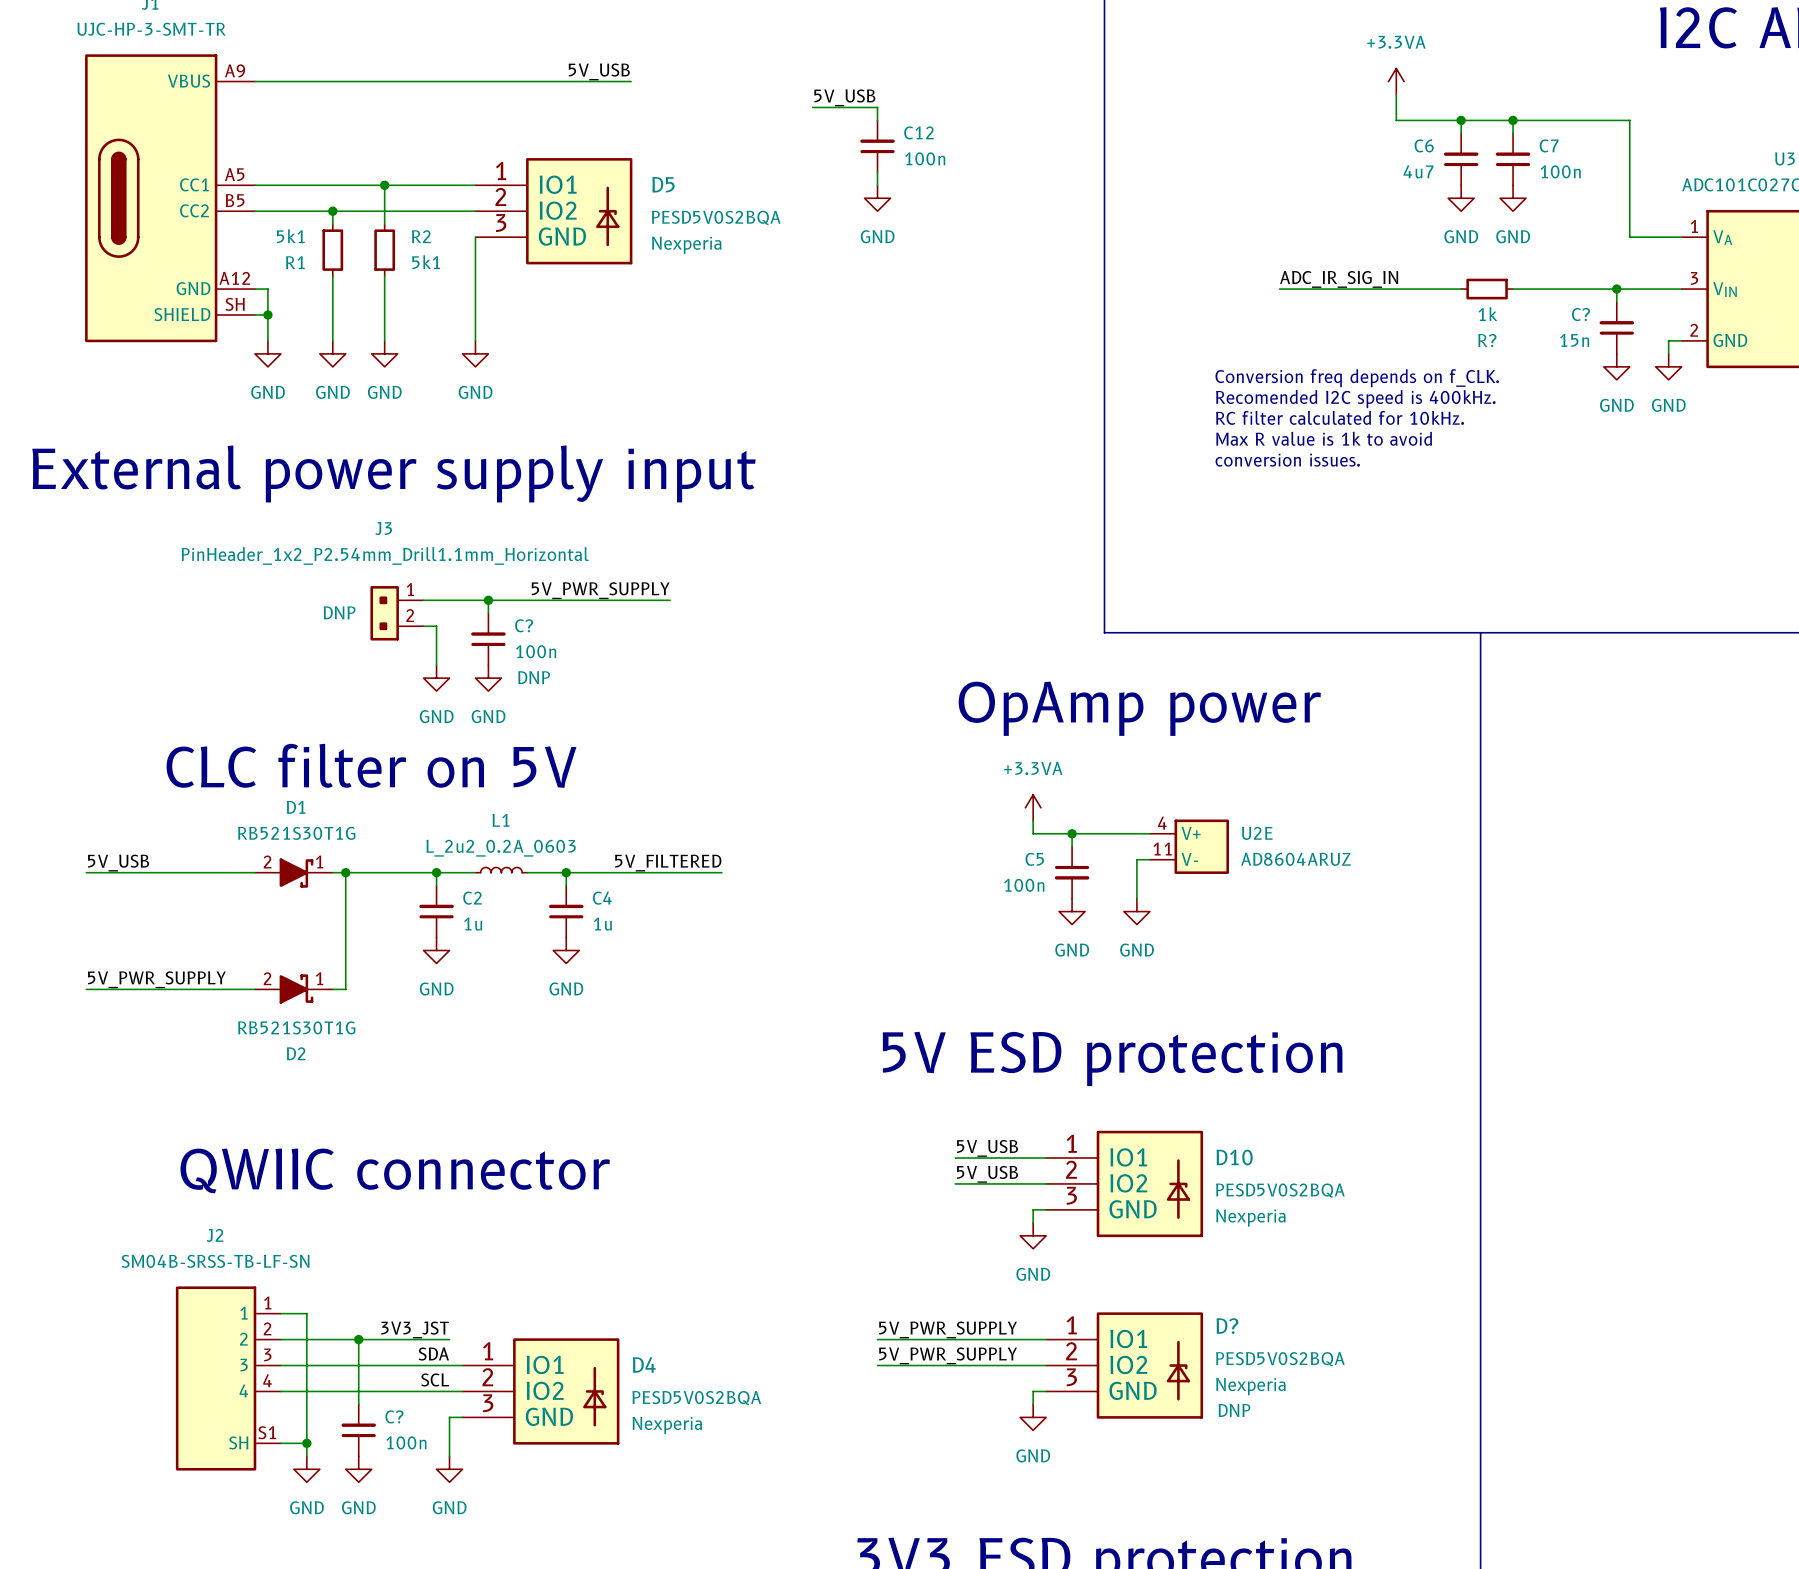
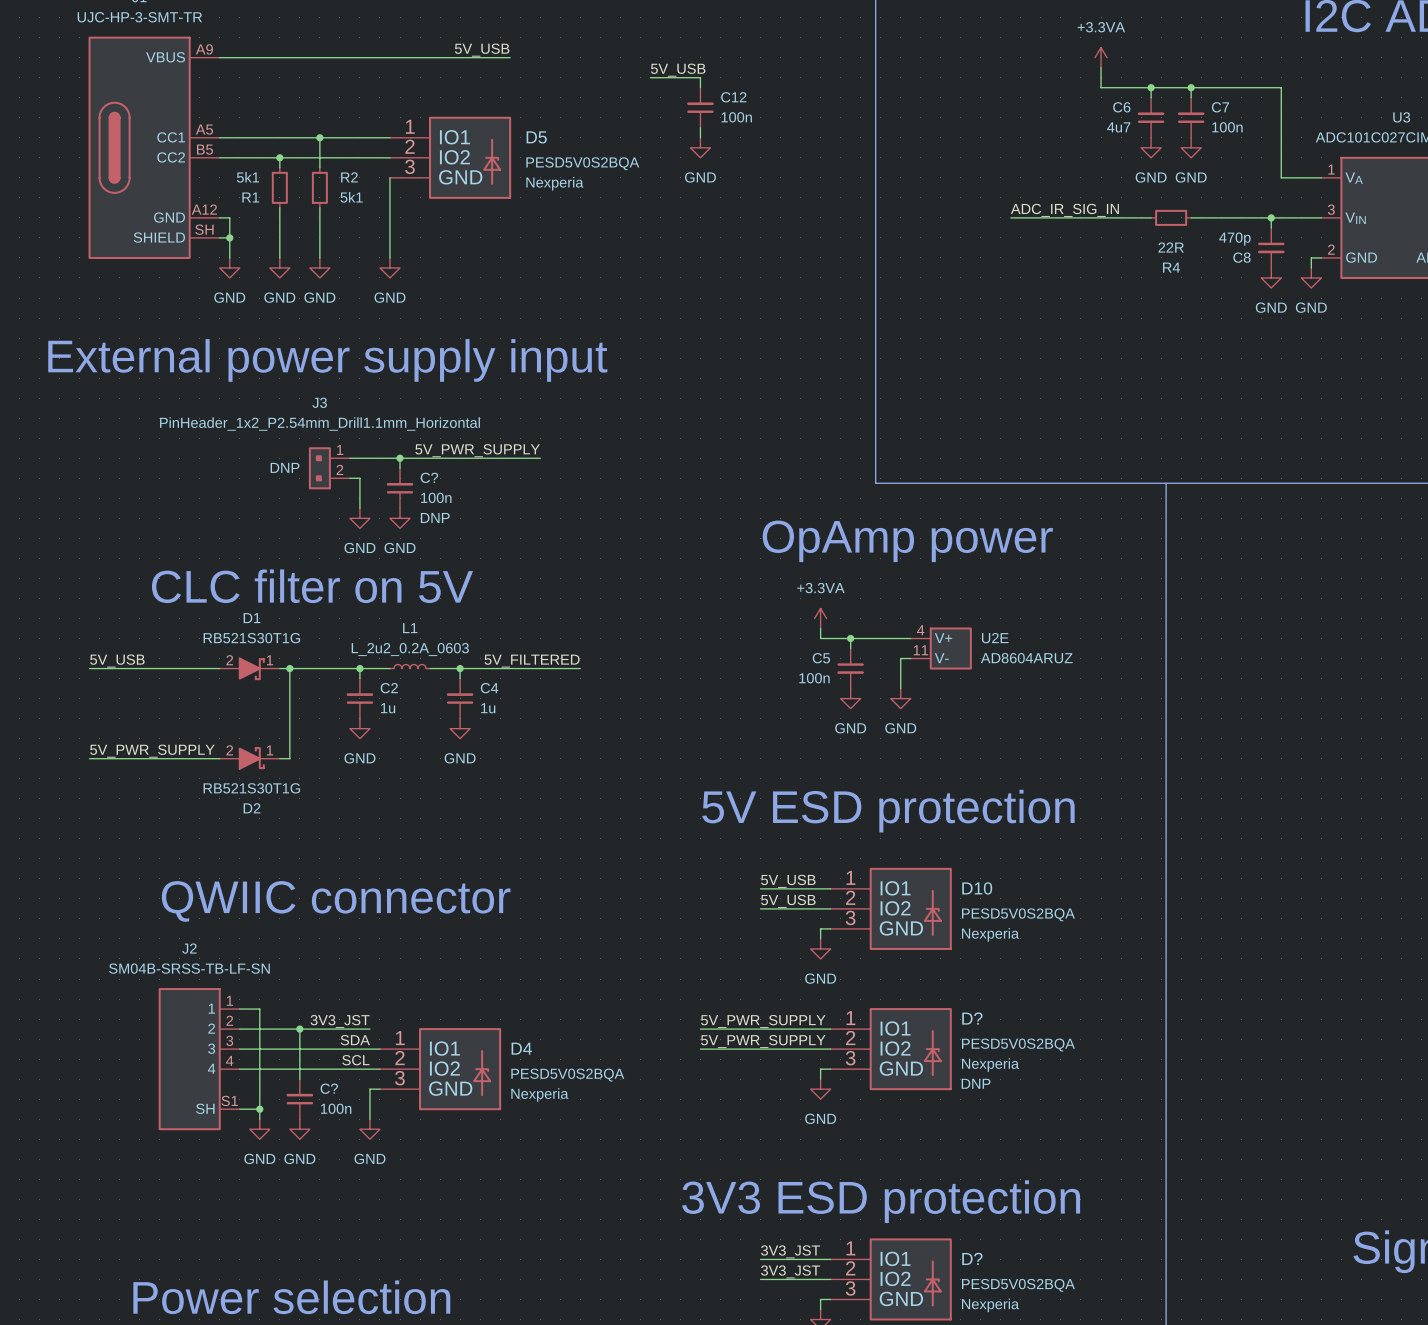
R? text: 1k (1487, 314) -> 22R (1171, 247)
C?: (1616, 327) -> none
C8: none -> (1271, 247)
R? name: R? (1487, 340) -> R4 (1171, 267)
text: Conversion freq depends on f_CLK. (1357, 378) -> none
text: Recomended I2C speed is 400kHz. (1355, 399) -> none
text: RC filter calculated for 10kHz. (1340, 417) -> none
text: Max R value is 1k to avoid (1324, 438) -> none
text: conversion issues. (1287, 460) -> none

